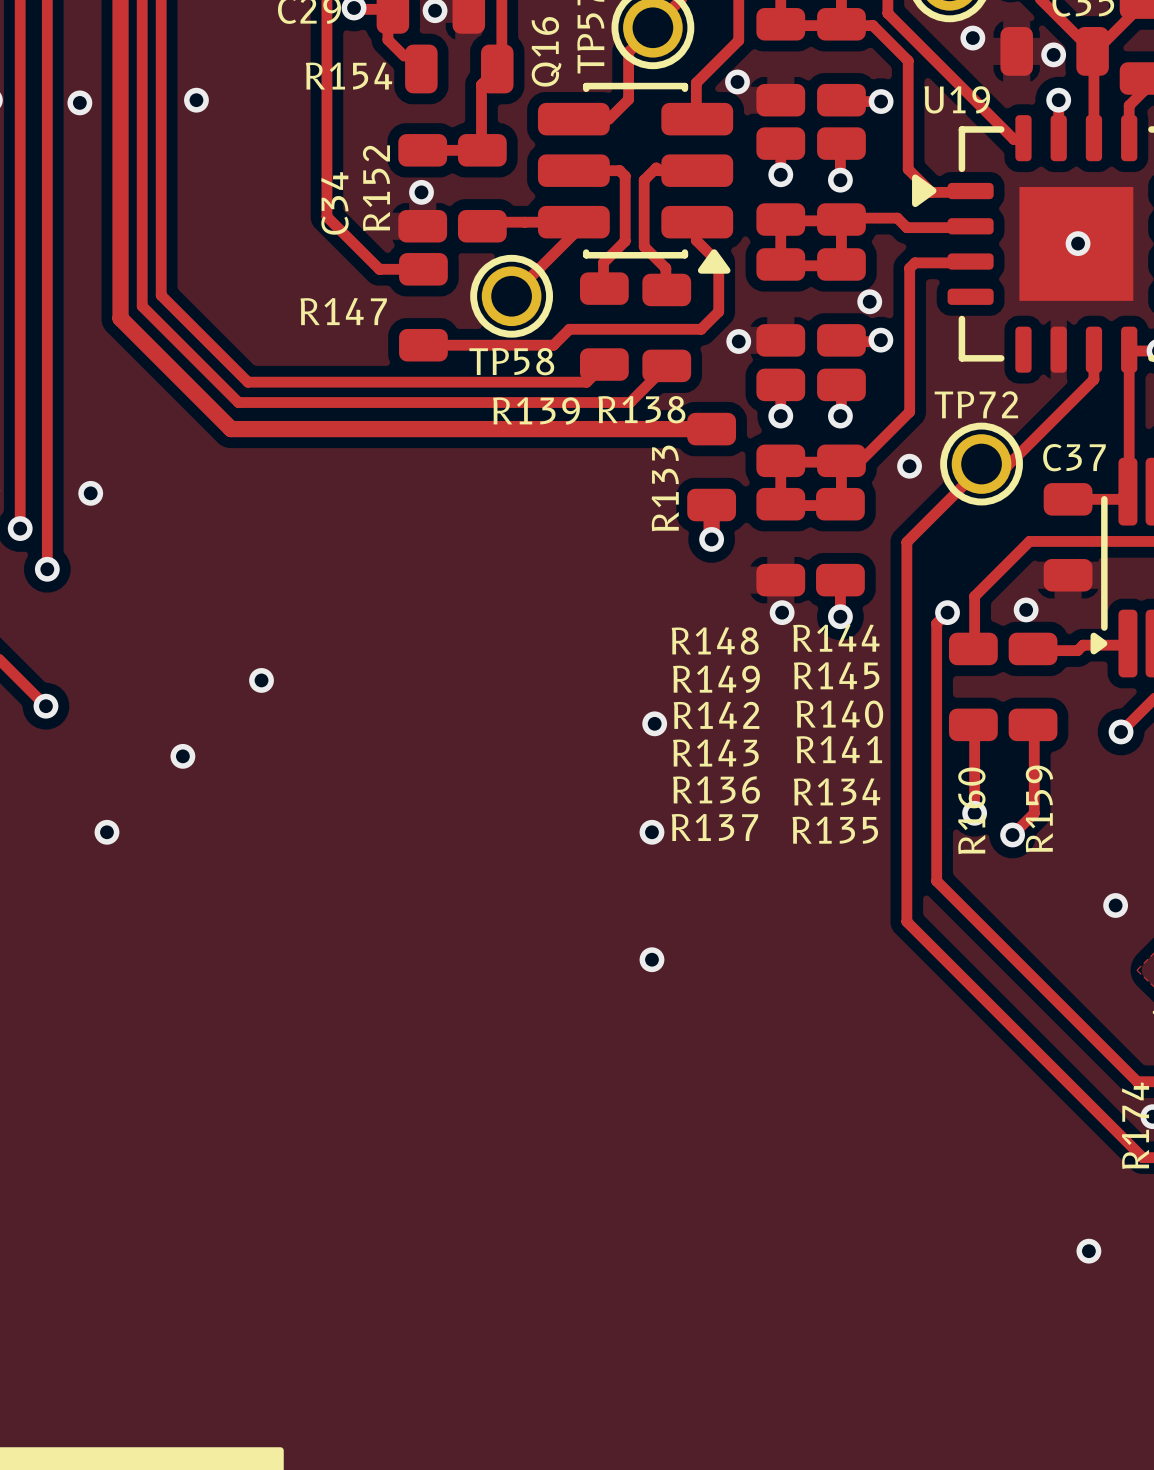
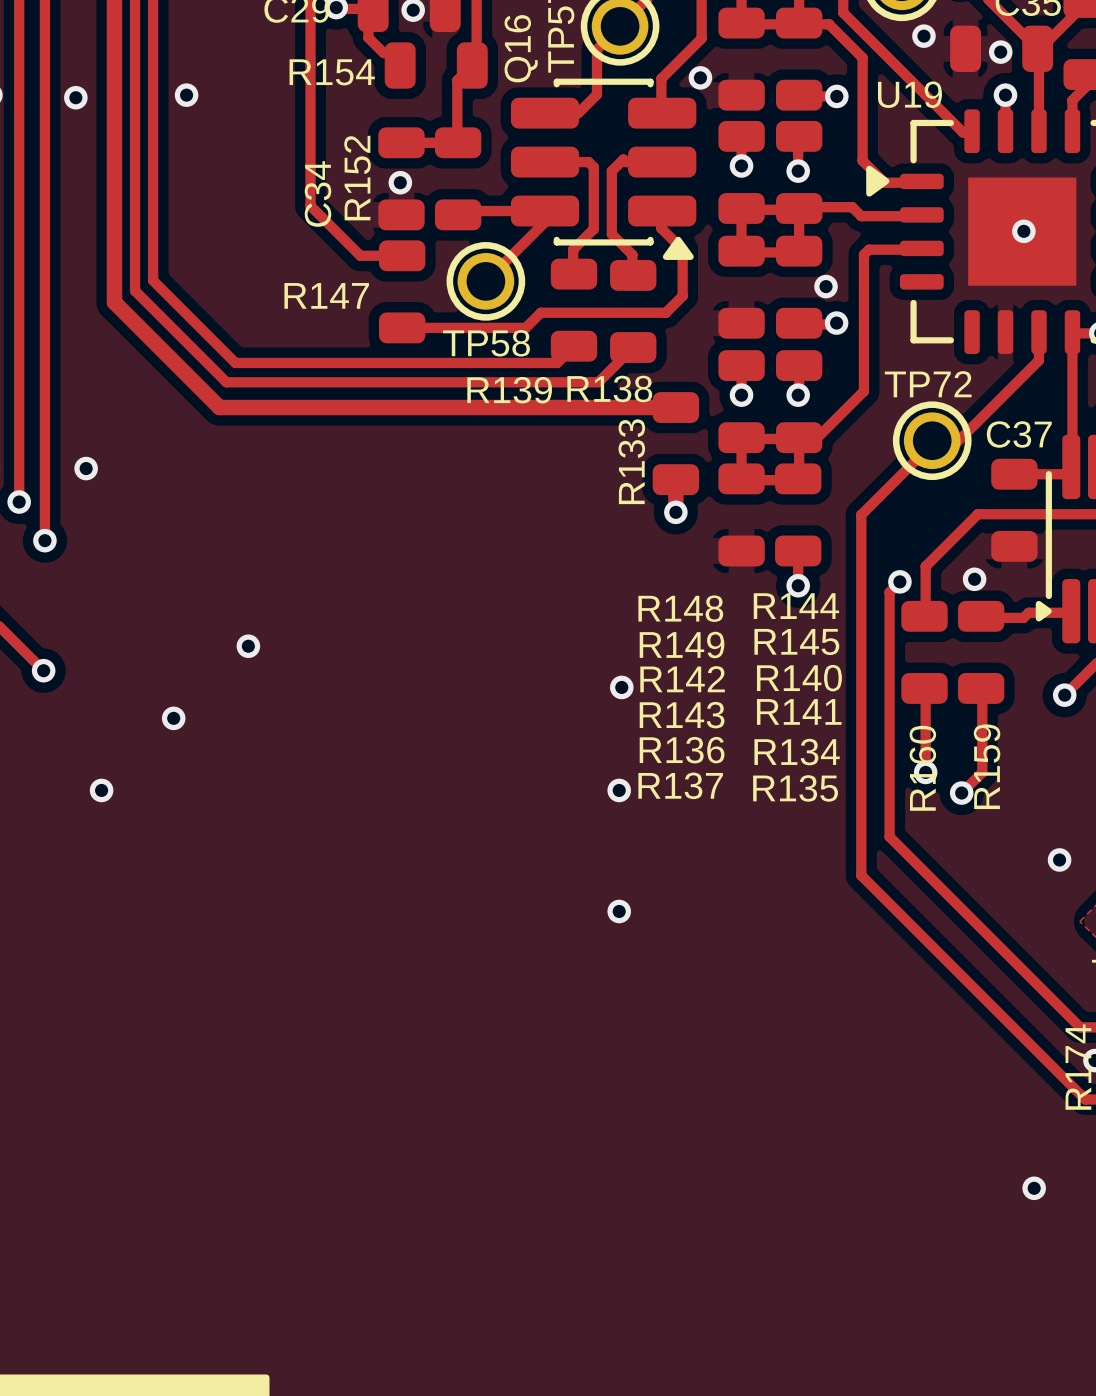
via: (738, 341) -> none
via: (909, 466) -> none
via: (782, 612) -> none

